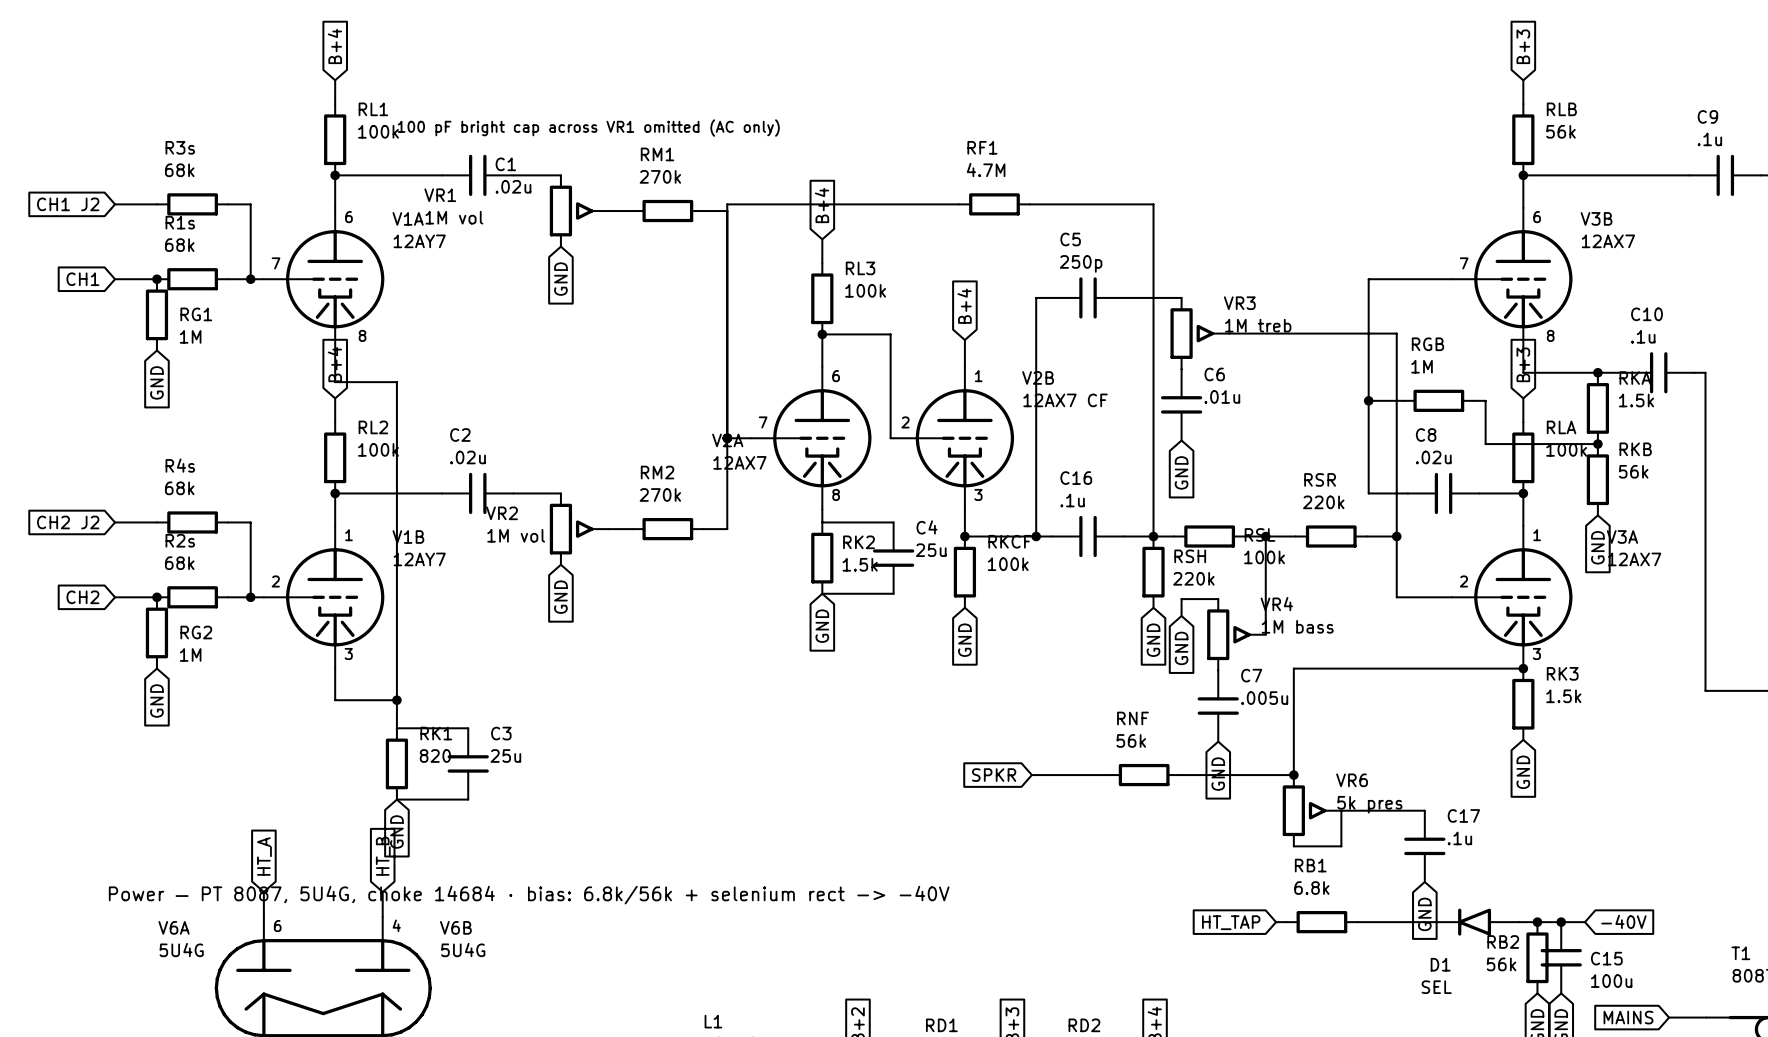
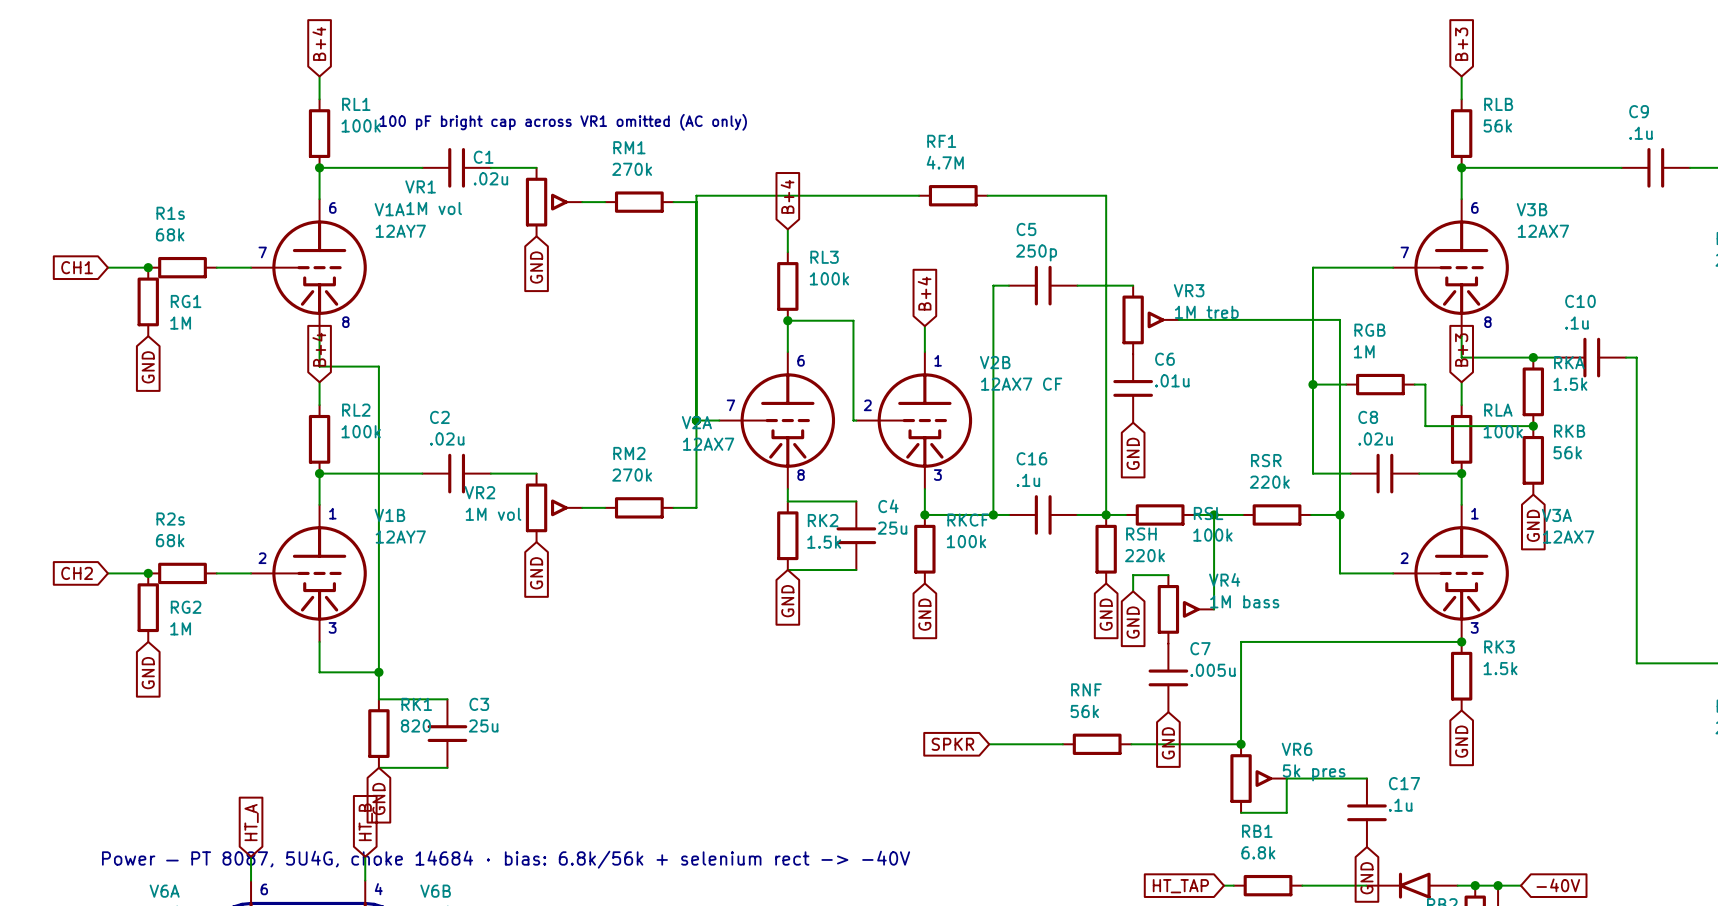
global label: CH1 J2 (68, 204) -> none
wire: (115, 204) (156, 204) -> none
R3s: 68k (192, 204) -> none
wire: (228, 204) (250, 204) (250, 279) -> none
junction: (250, 279) -> none
global label: CH2 J2 (68, 522) -> none
wire: (115, 522) (156, 522) -> none
R4s: 68k (192, 522) -> none
wire: (228, 522) (250, 522) (250, 597) -> none
junction: (250, 597) -> none

